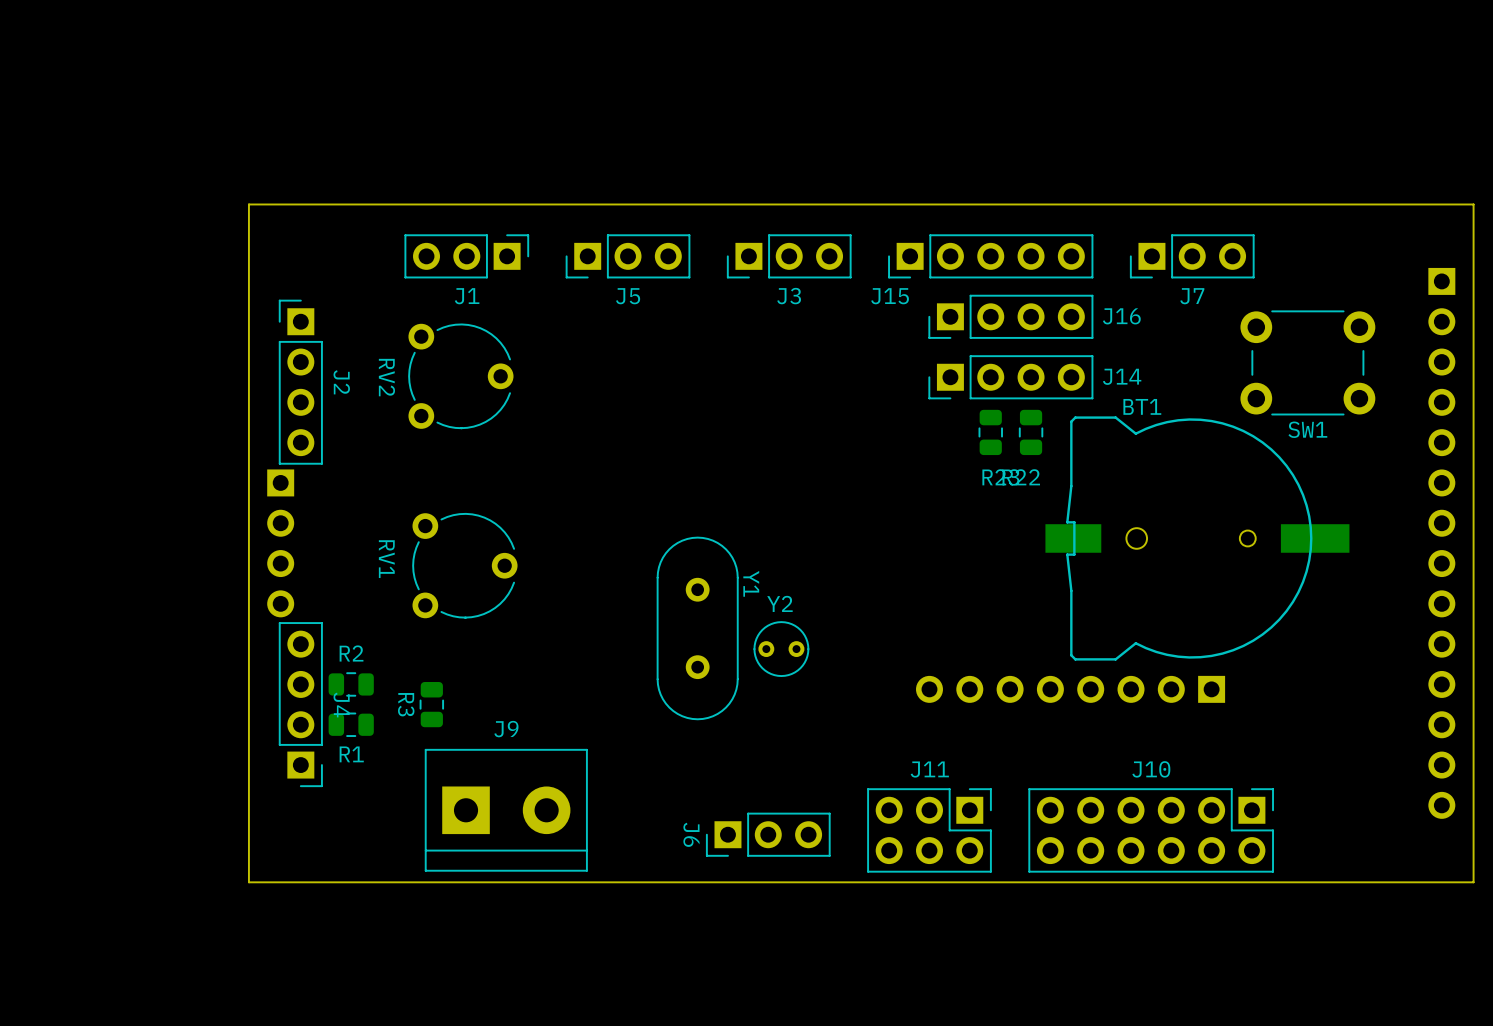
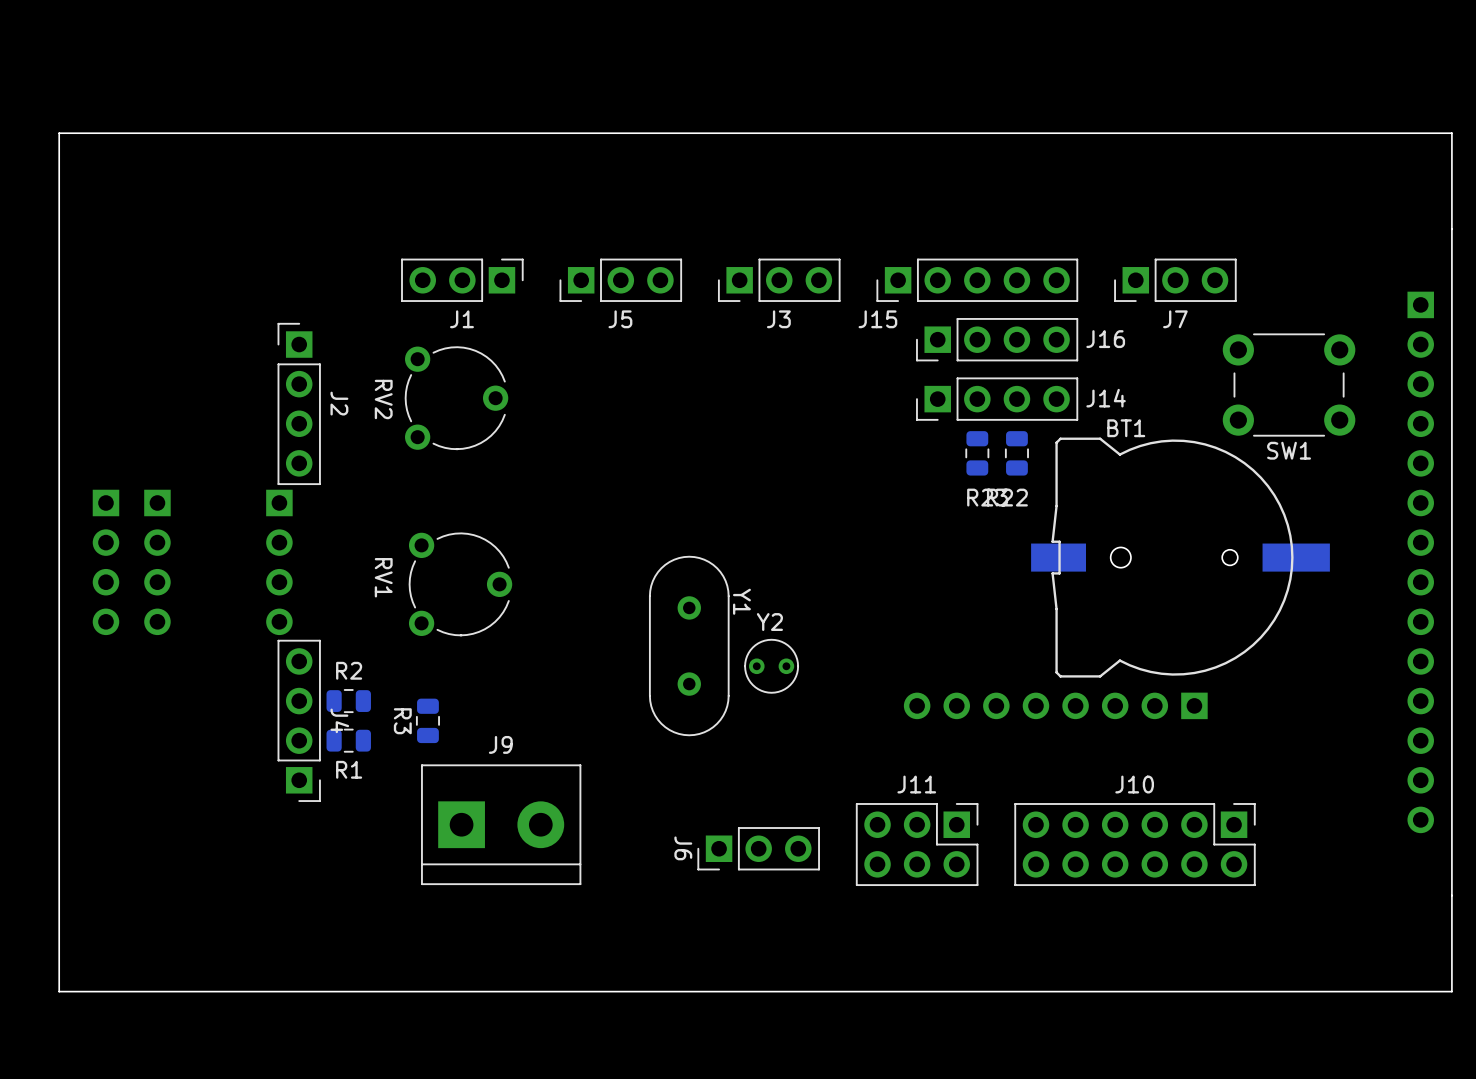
board edge: (1473, 204) (248, 204) (248, 882) (1473, 882) -> (1451, 229) (1451, 133) (59, 133) (59, 991) (1451, 991) (1451, 895)
part: none -> (105, 562)
part: none -> (157, 562)

